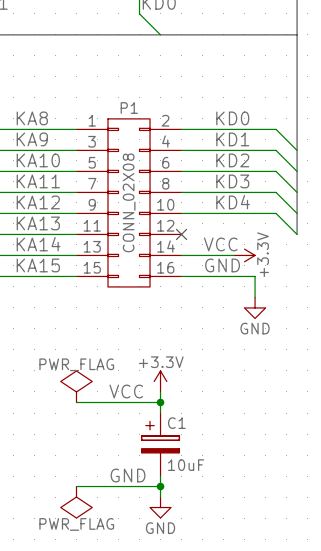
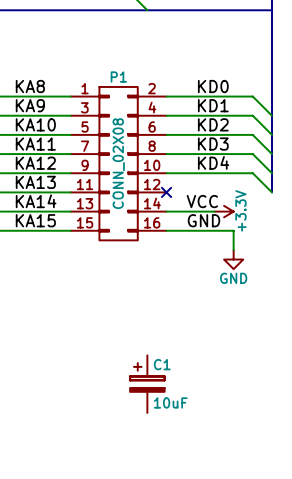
power symbol: +3.3V (160, 381) -> none
power symbol: PWR_FLAG (76, 386) -> none
label: VCC (126, 391) -> none
wire: (160, 391) (160, 413) -> none
wire: (76, 402) (160, 402) -> none
junction: (160, 402) -> none
label: GND (128, 475) -> none
wire: (160, 476) (160, 497) -> none
wire: (76, 486) (160, 486) -> none
junction: (160, 486) -> none
power symbol: PWR_FLAG (76, 502) -> none
power symbol: GND (160, 507) -> none

